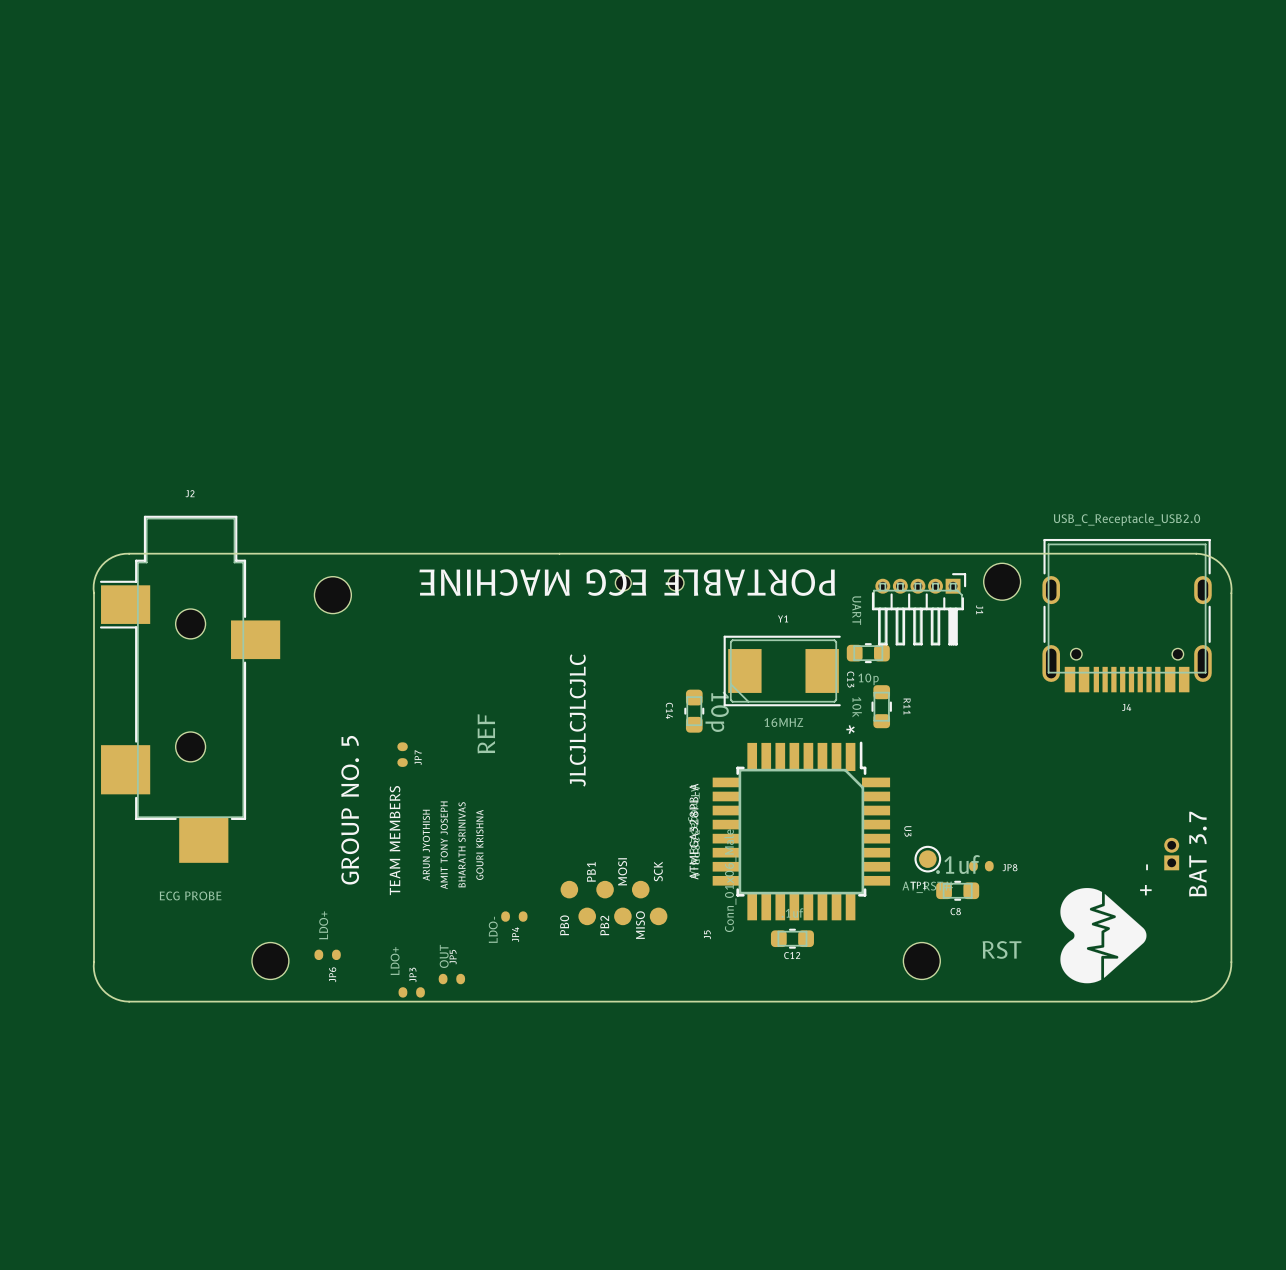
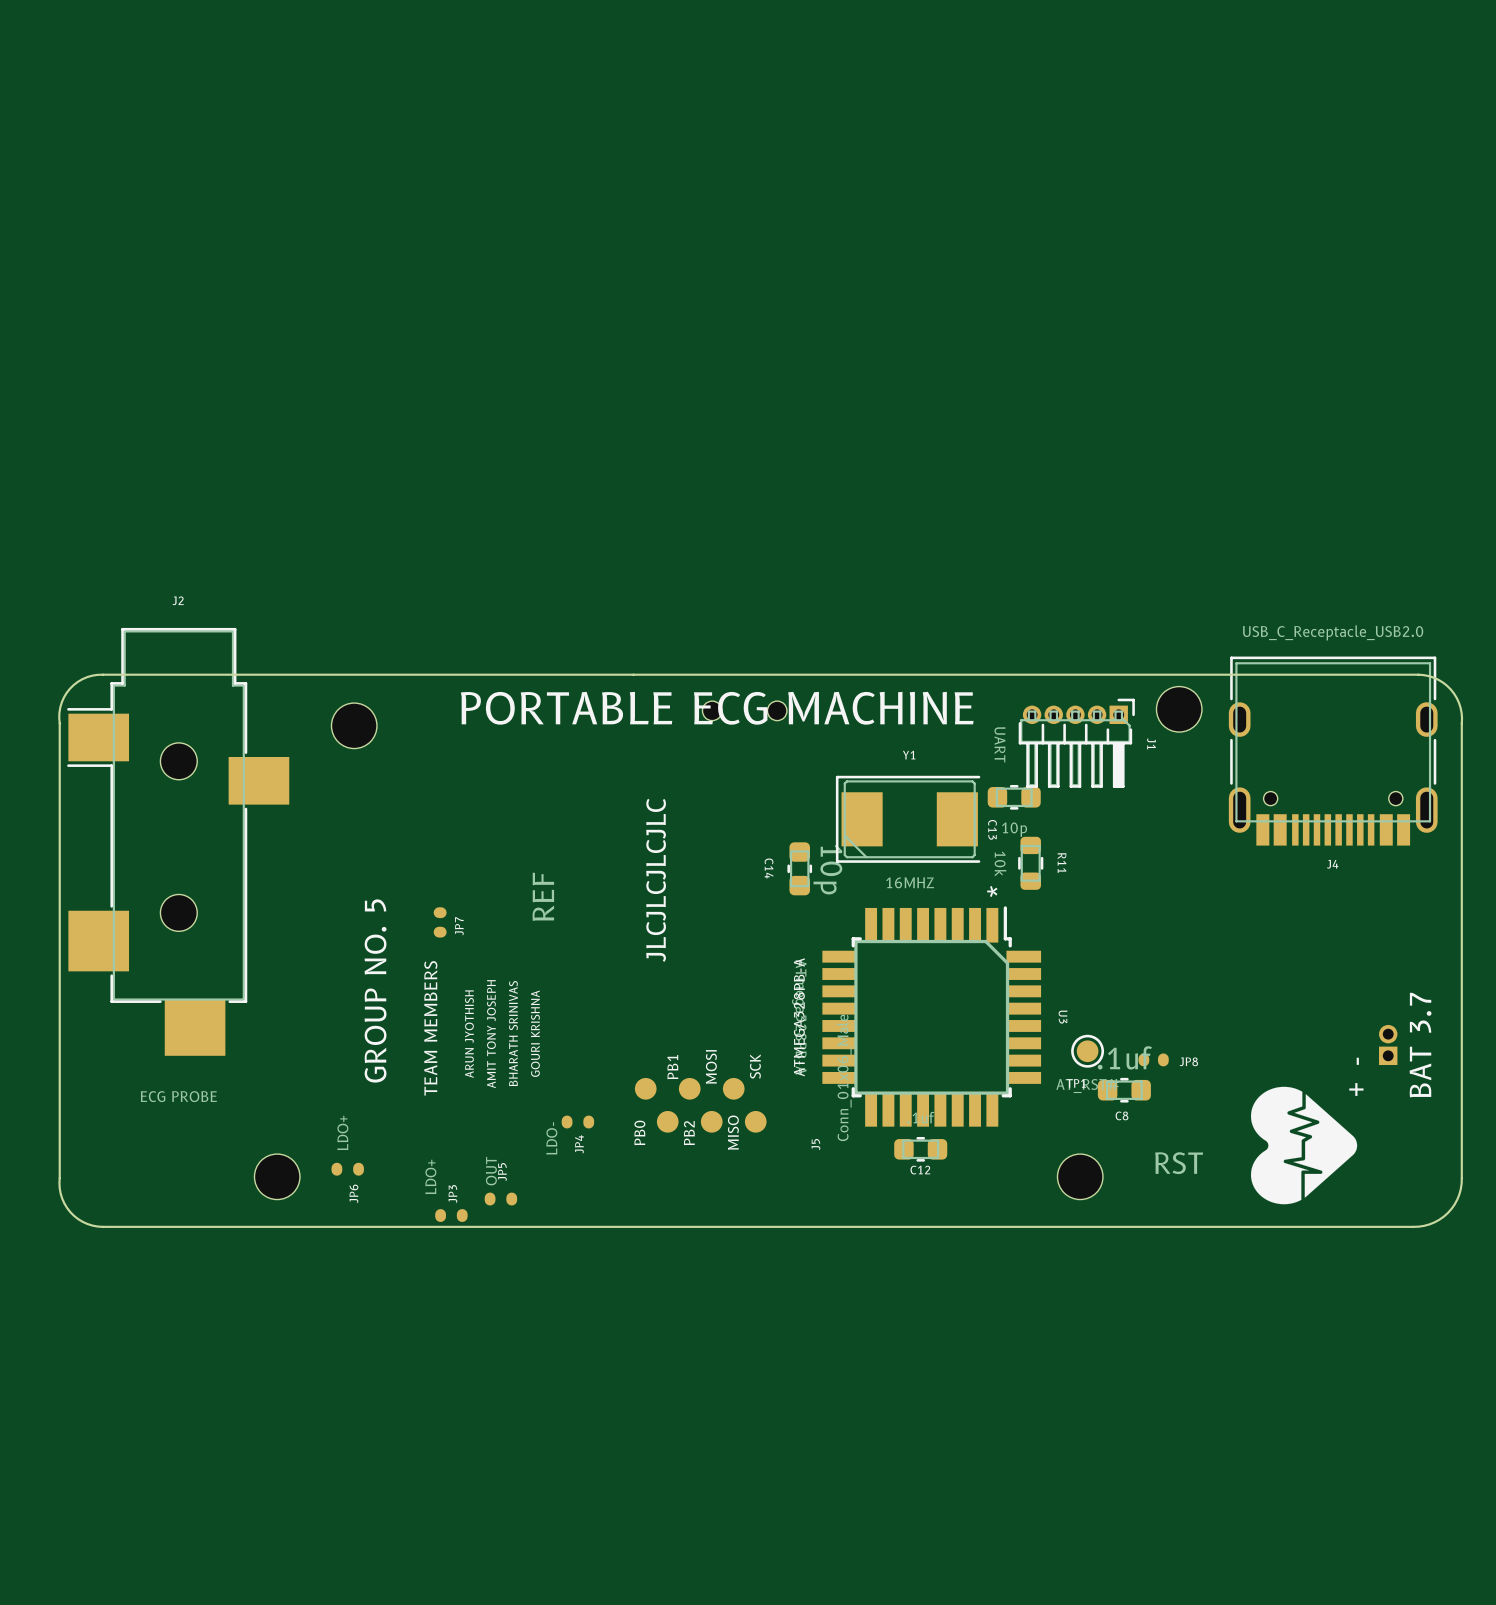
text rotation: 0° (627, 582) -> 180° (717, 708)

